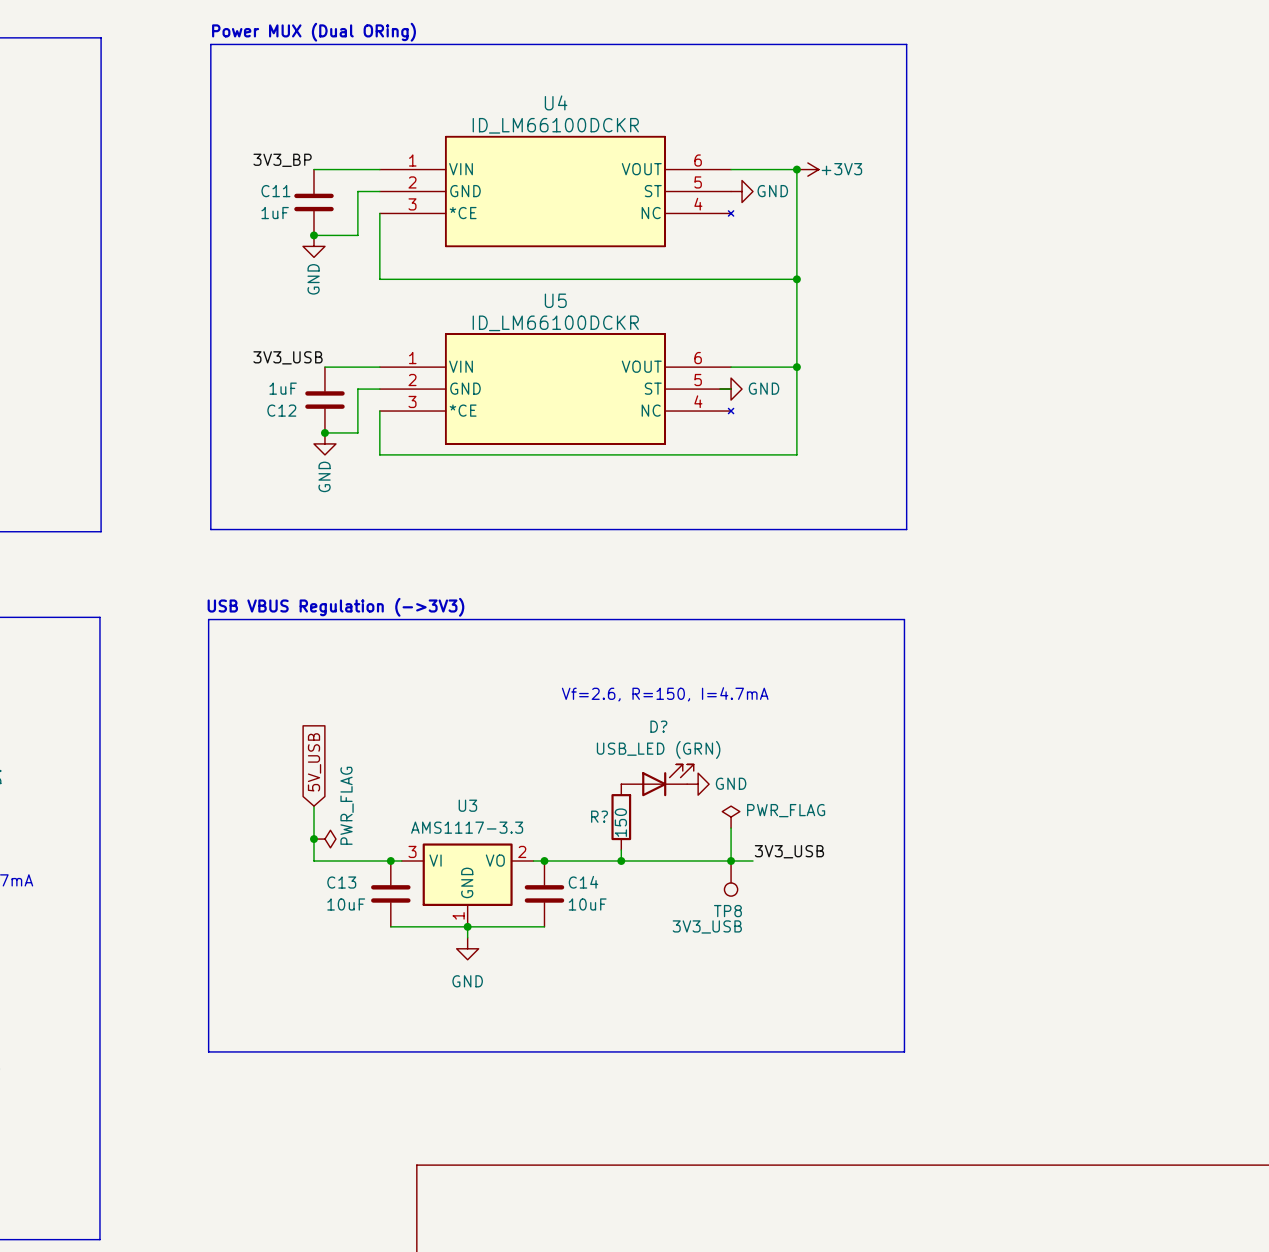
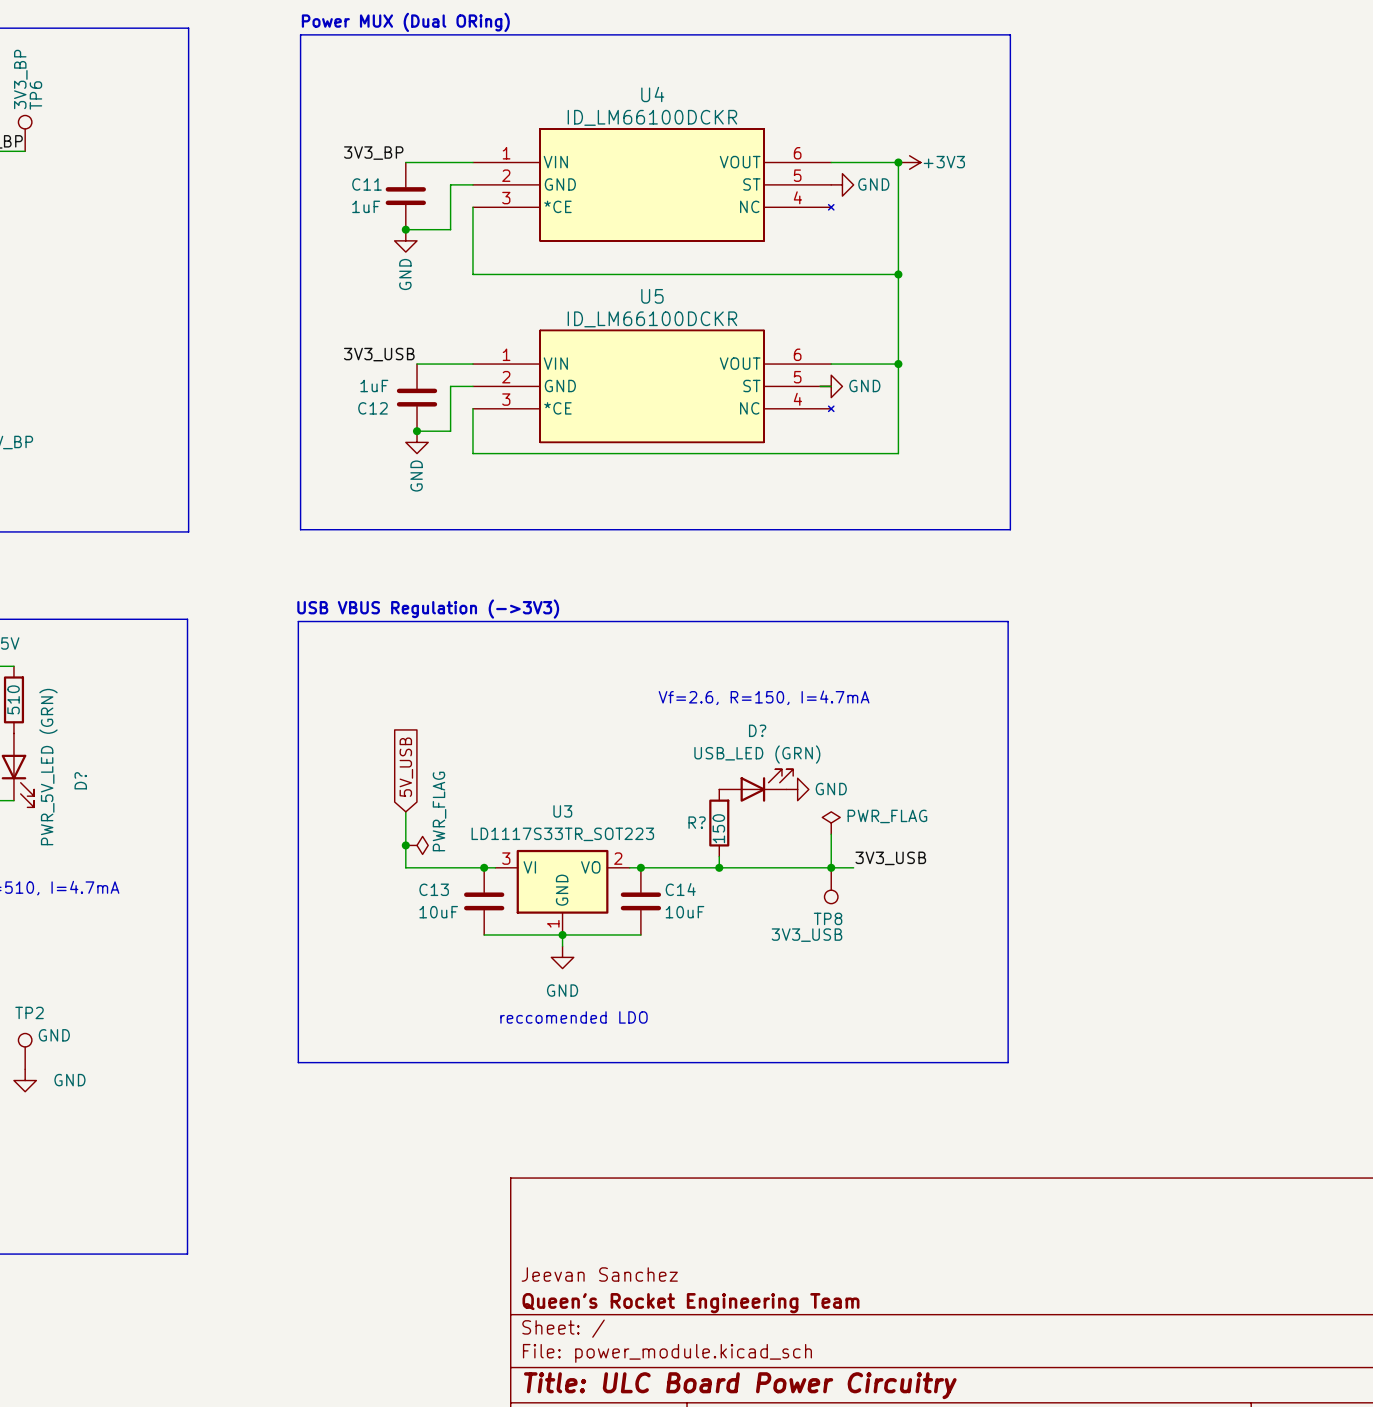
U3 value: AMS1117-3.3 (467, 827) -> LD1117S33TR_SOT223 (562, 834)
text: none -> reccomended LDO (574, 1017)

